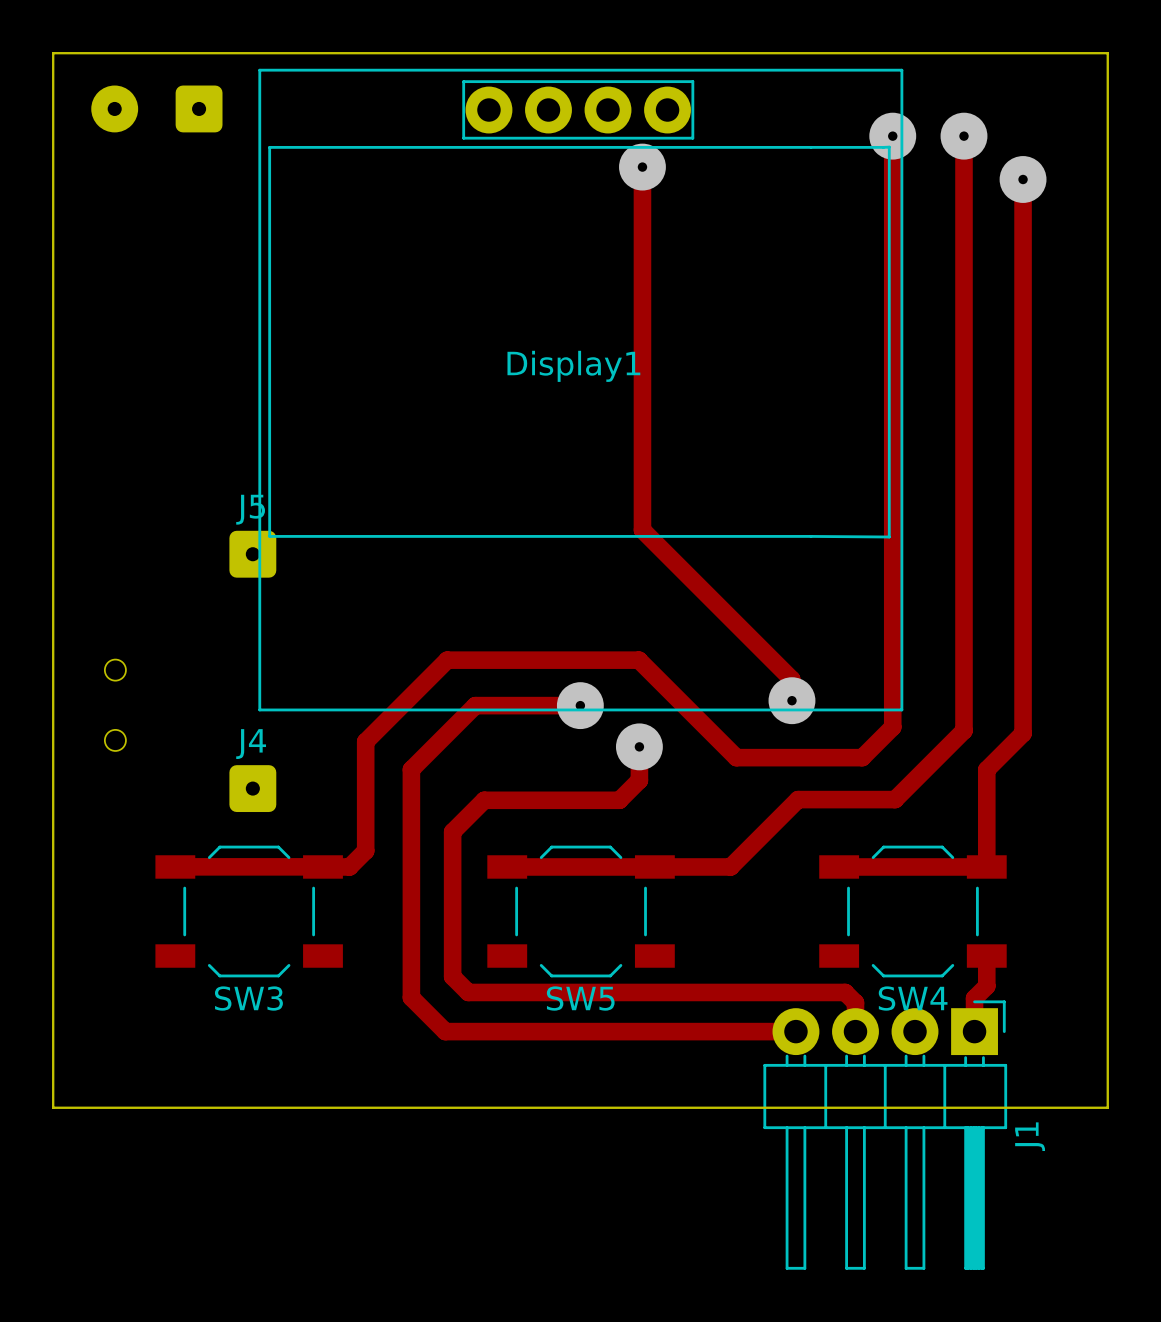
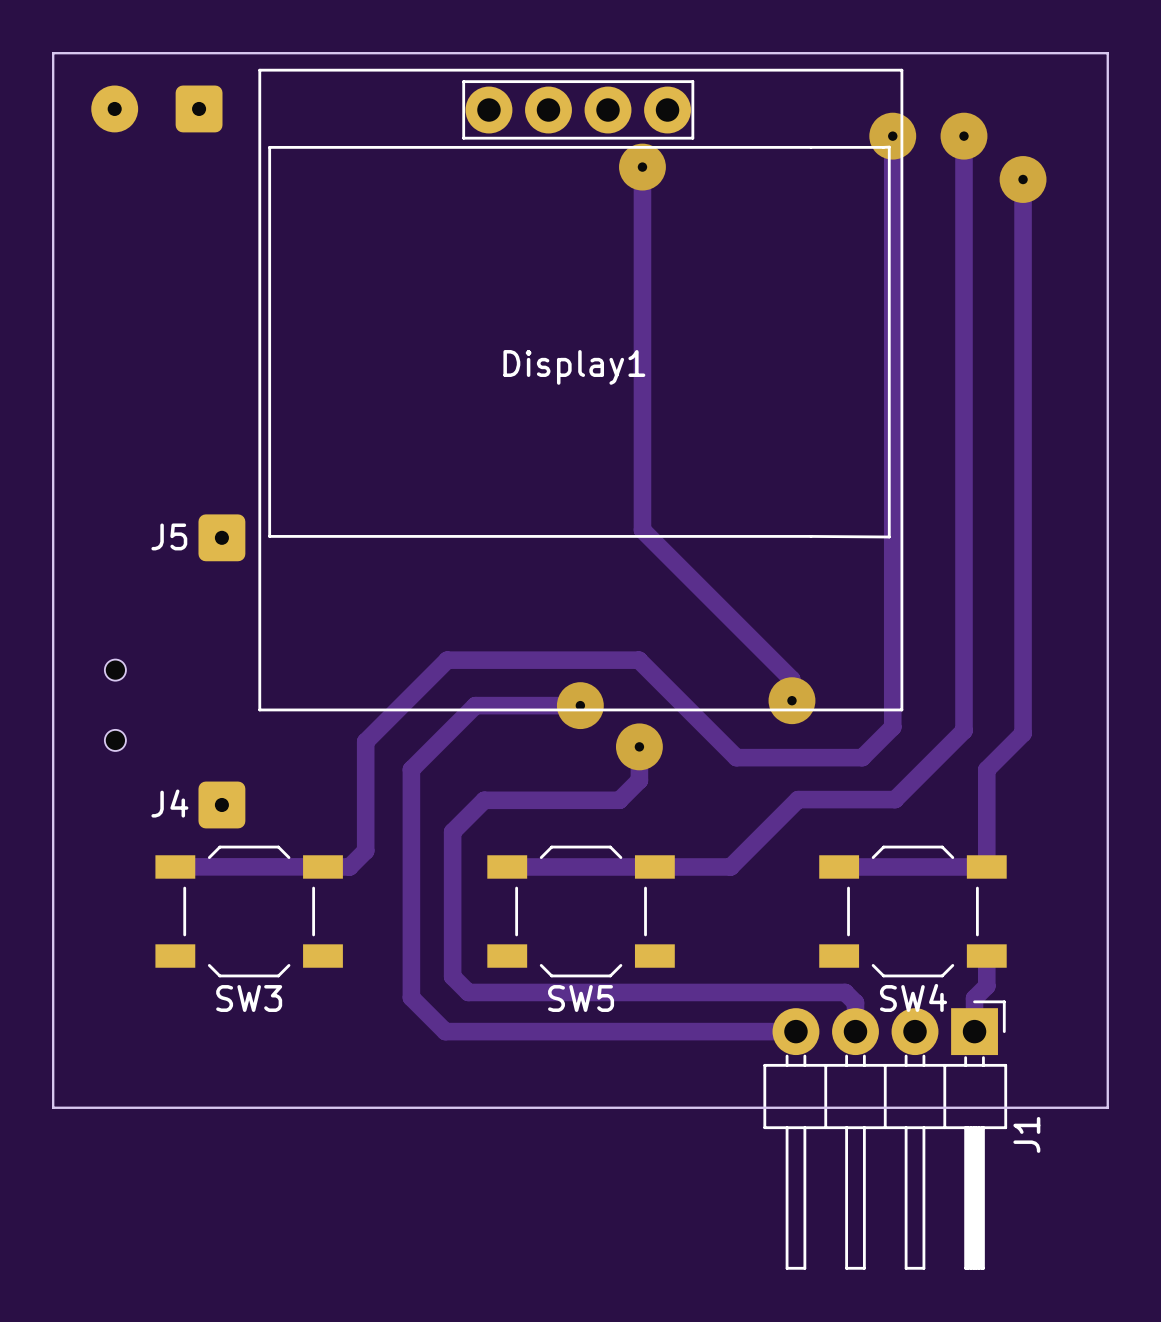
J5 name position: J5 (250, 509) -> J5 (169, 536)
J5 position: (252, 554) -> (221, 537)
J4 name position: J4 (251, 744) -> J4 (169, 803)
J4 position: (252, 788) -> (221, 804)

